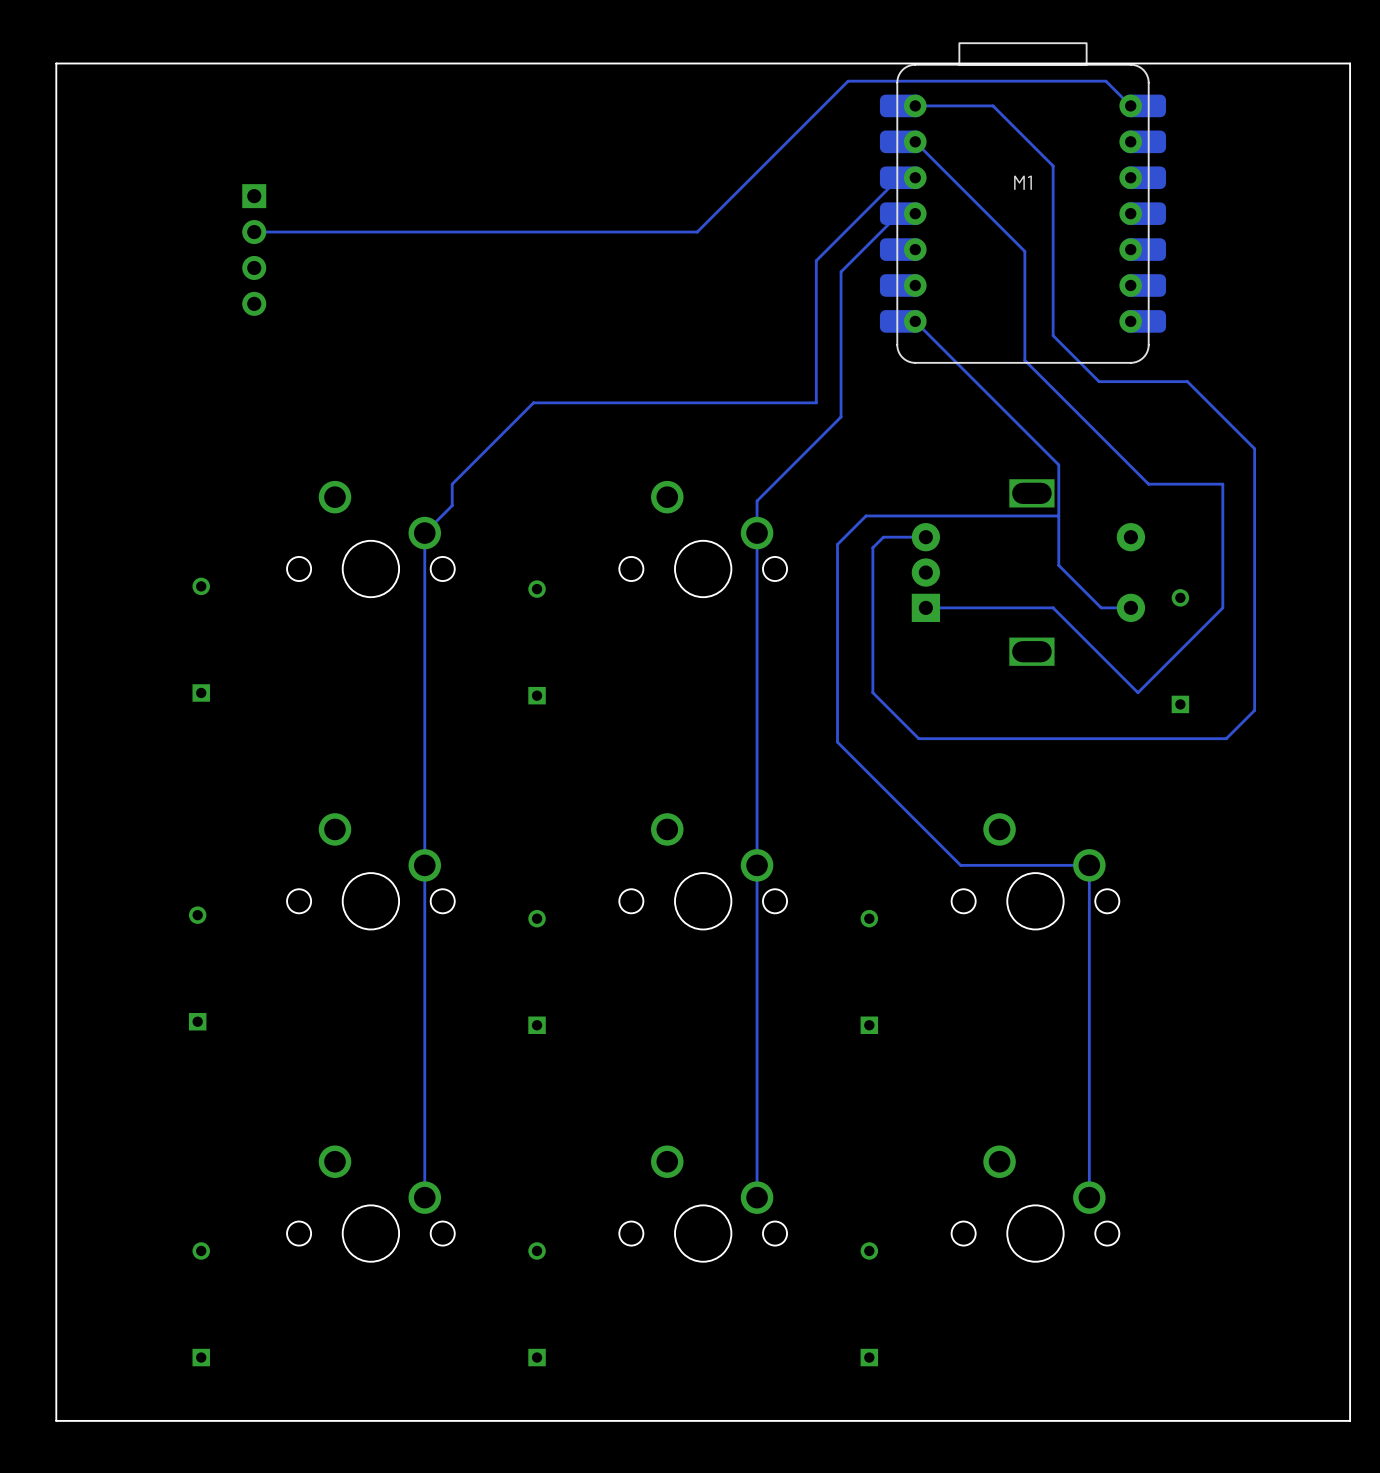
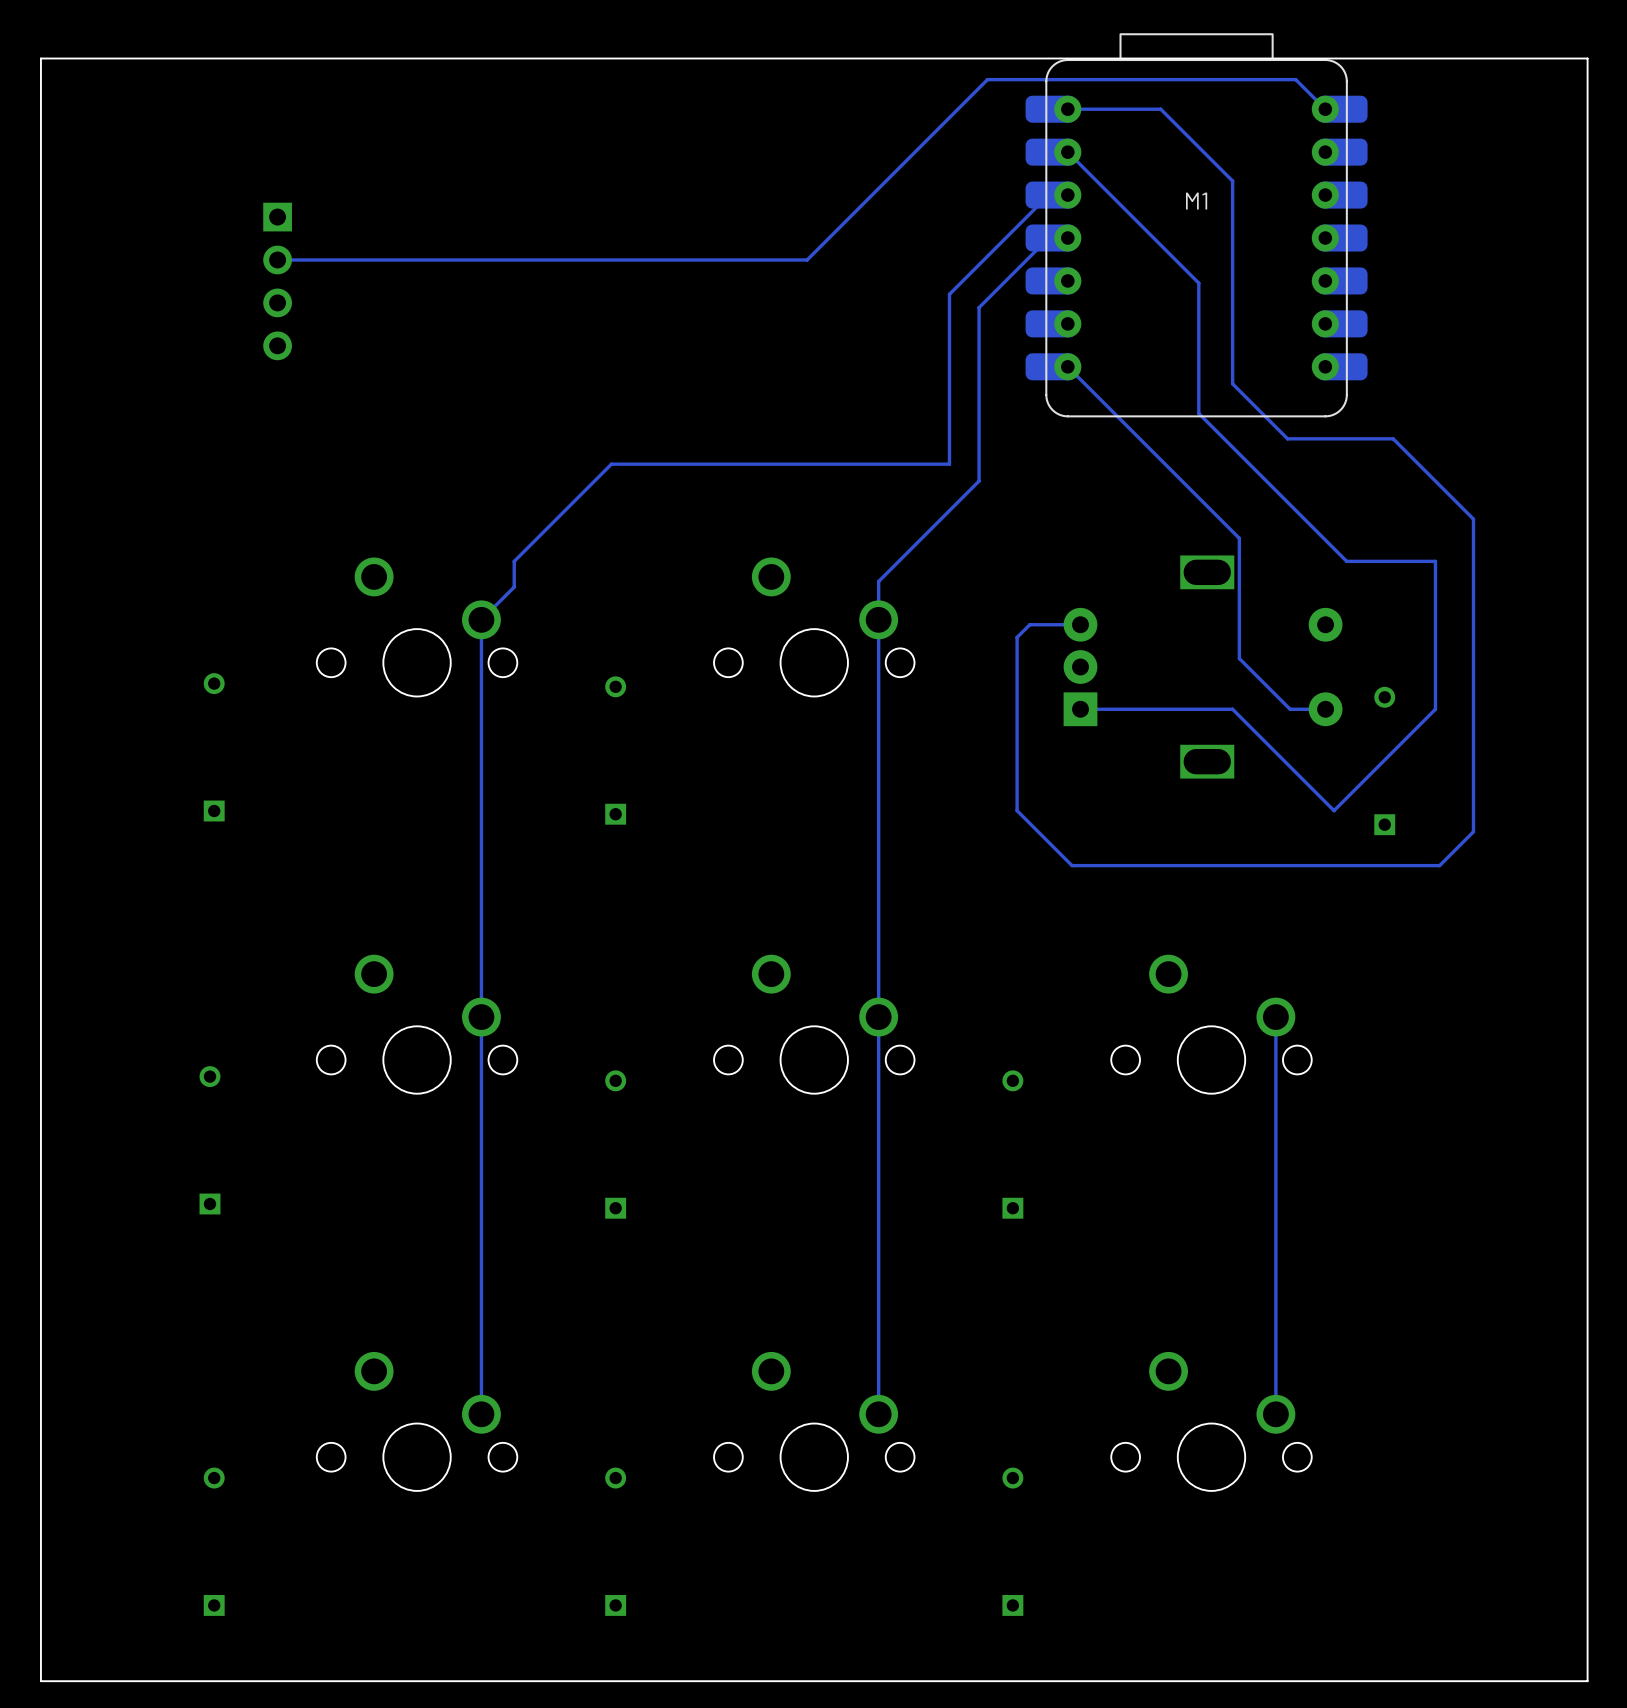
track: (1058, 515) (866, 515) (837, 544) (837, 742) (960, 865) (1089, 865) -> none

